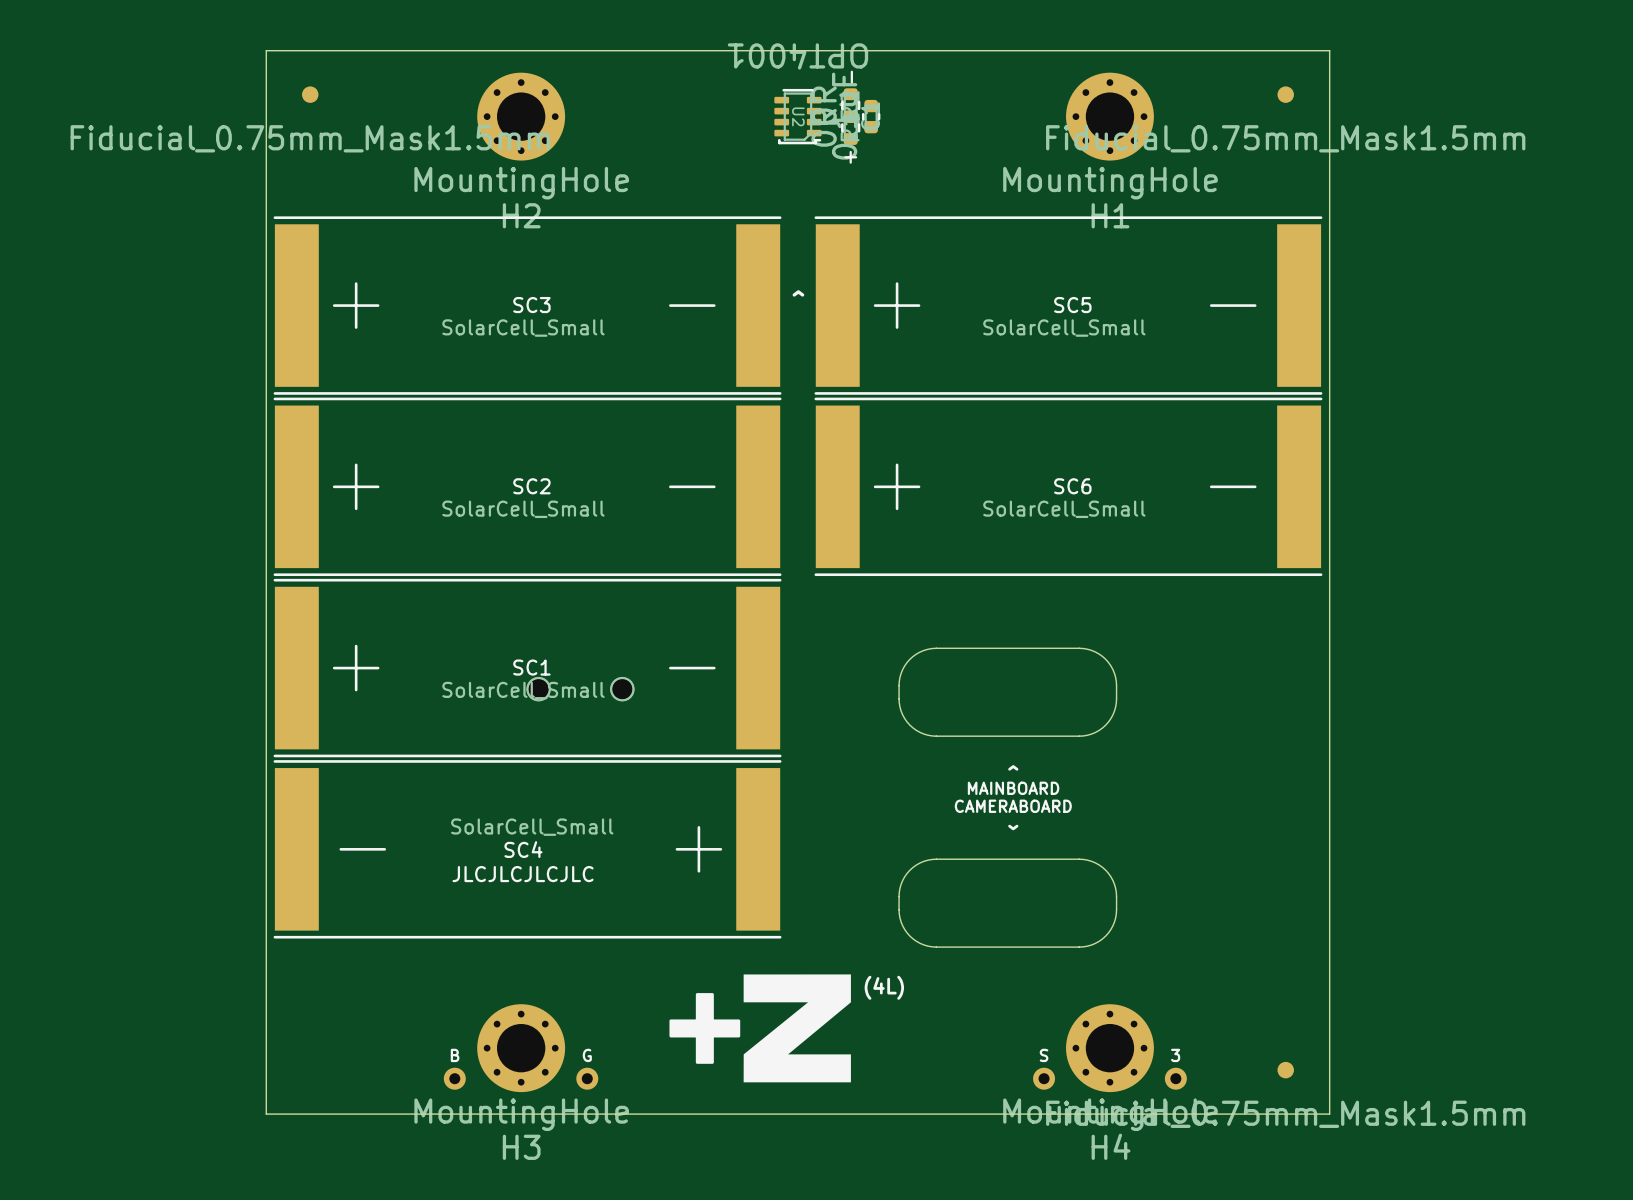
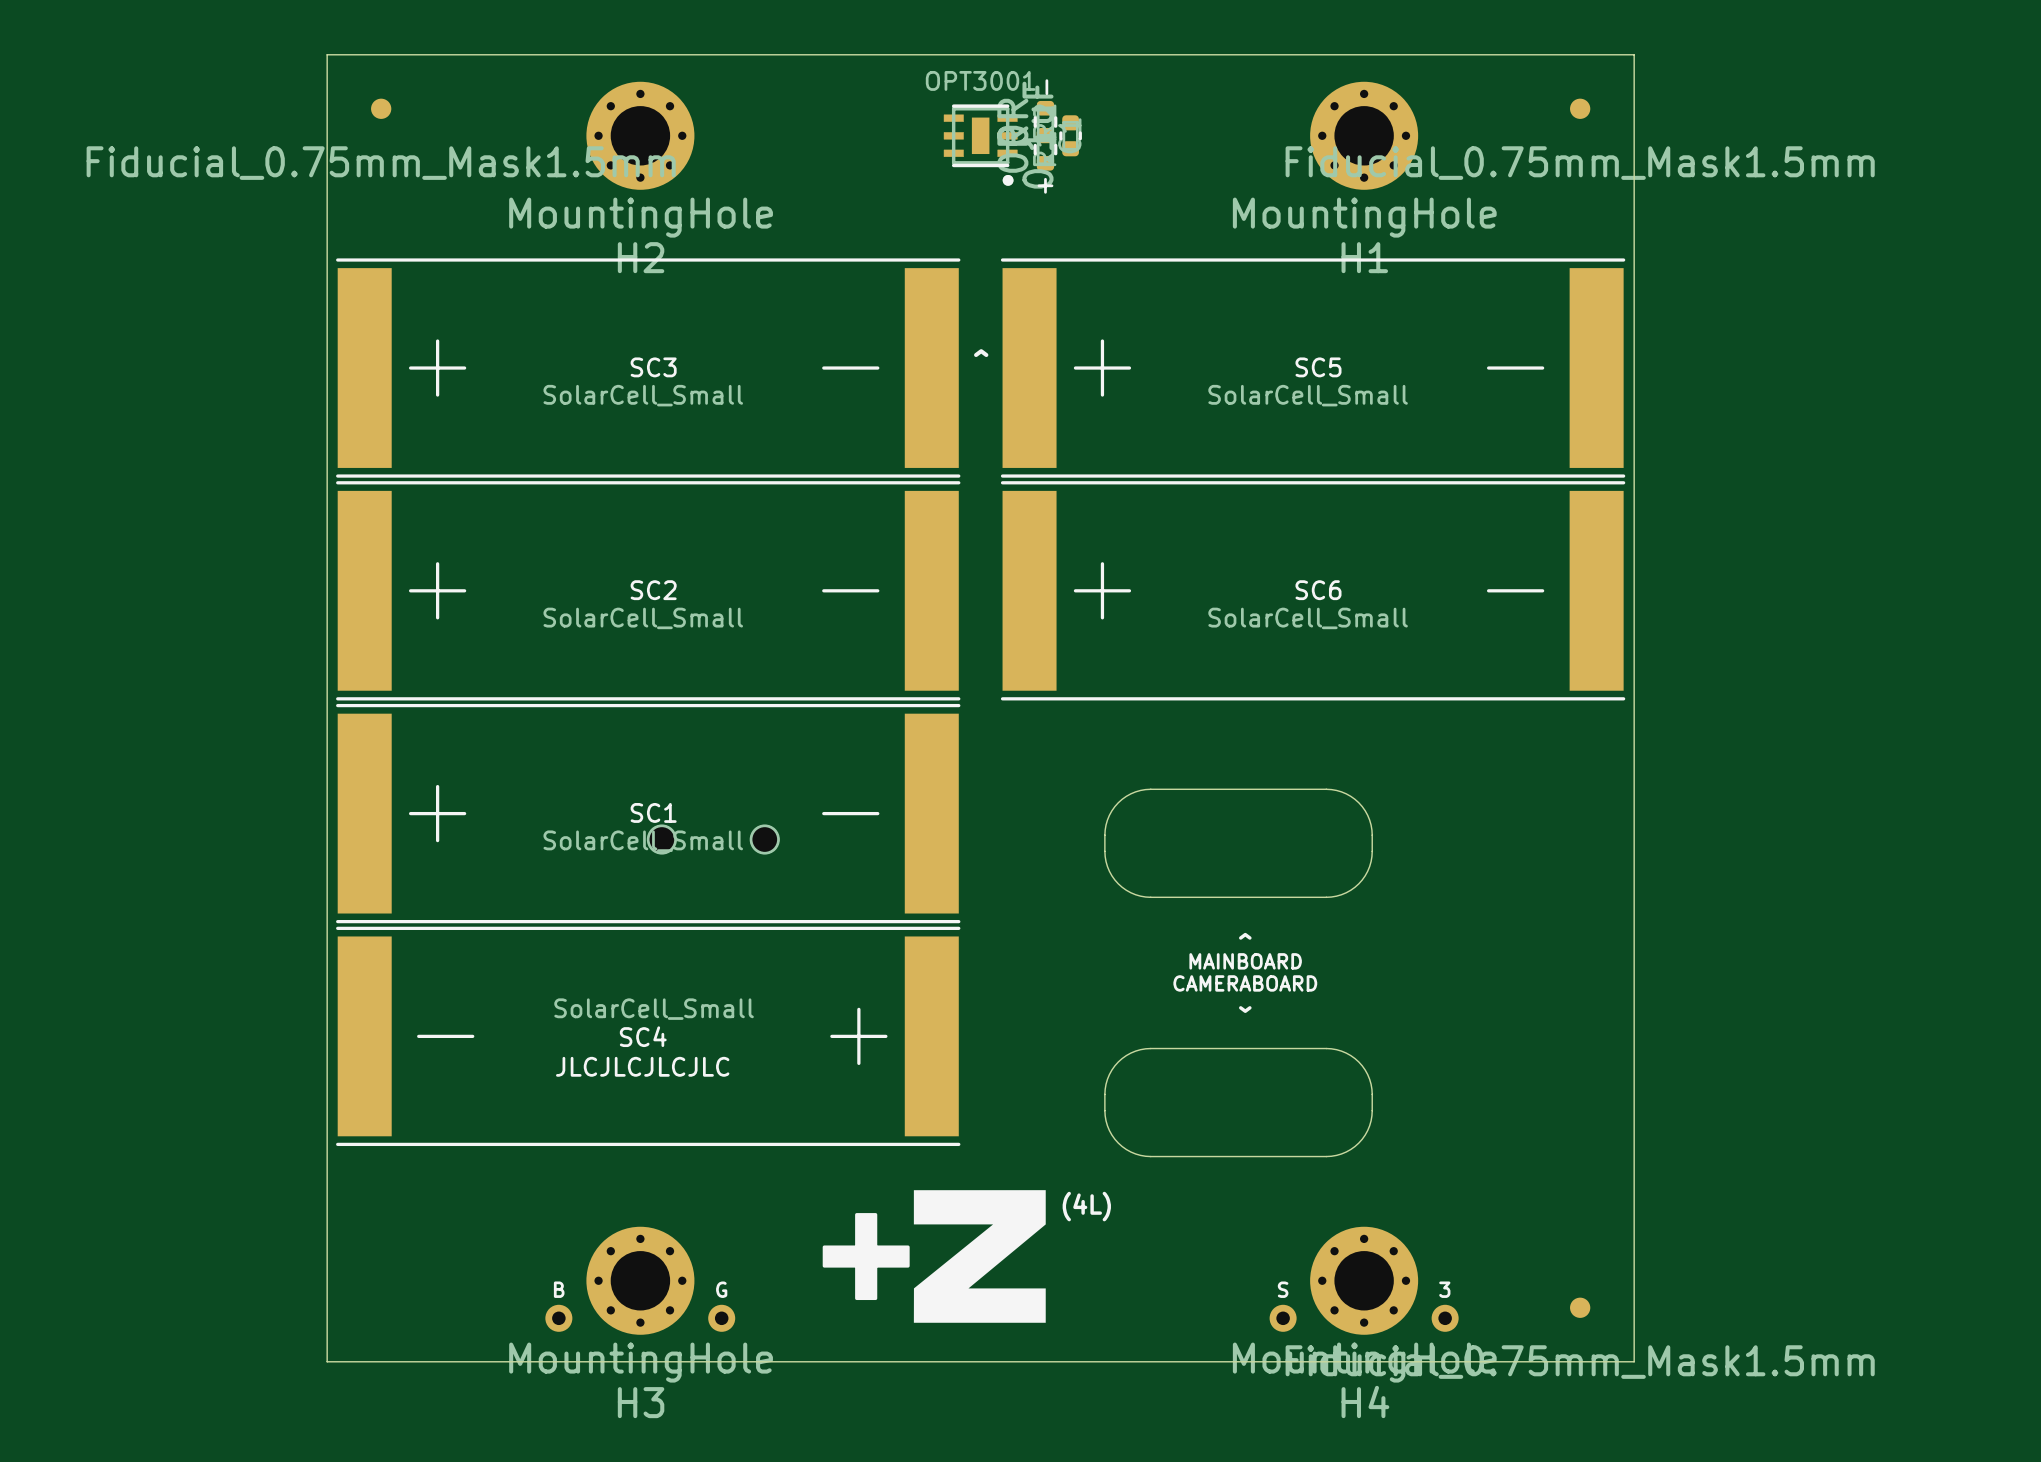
U2: OPT4001 (797, 116) -> none
part: none -> OPT3001 (980, 145)

